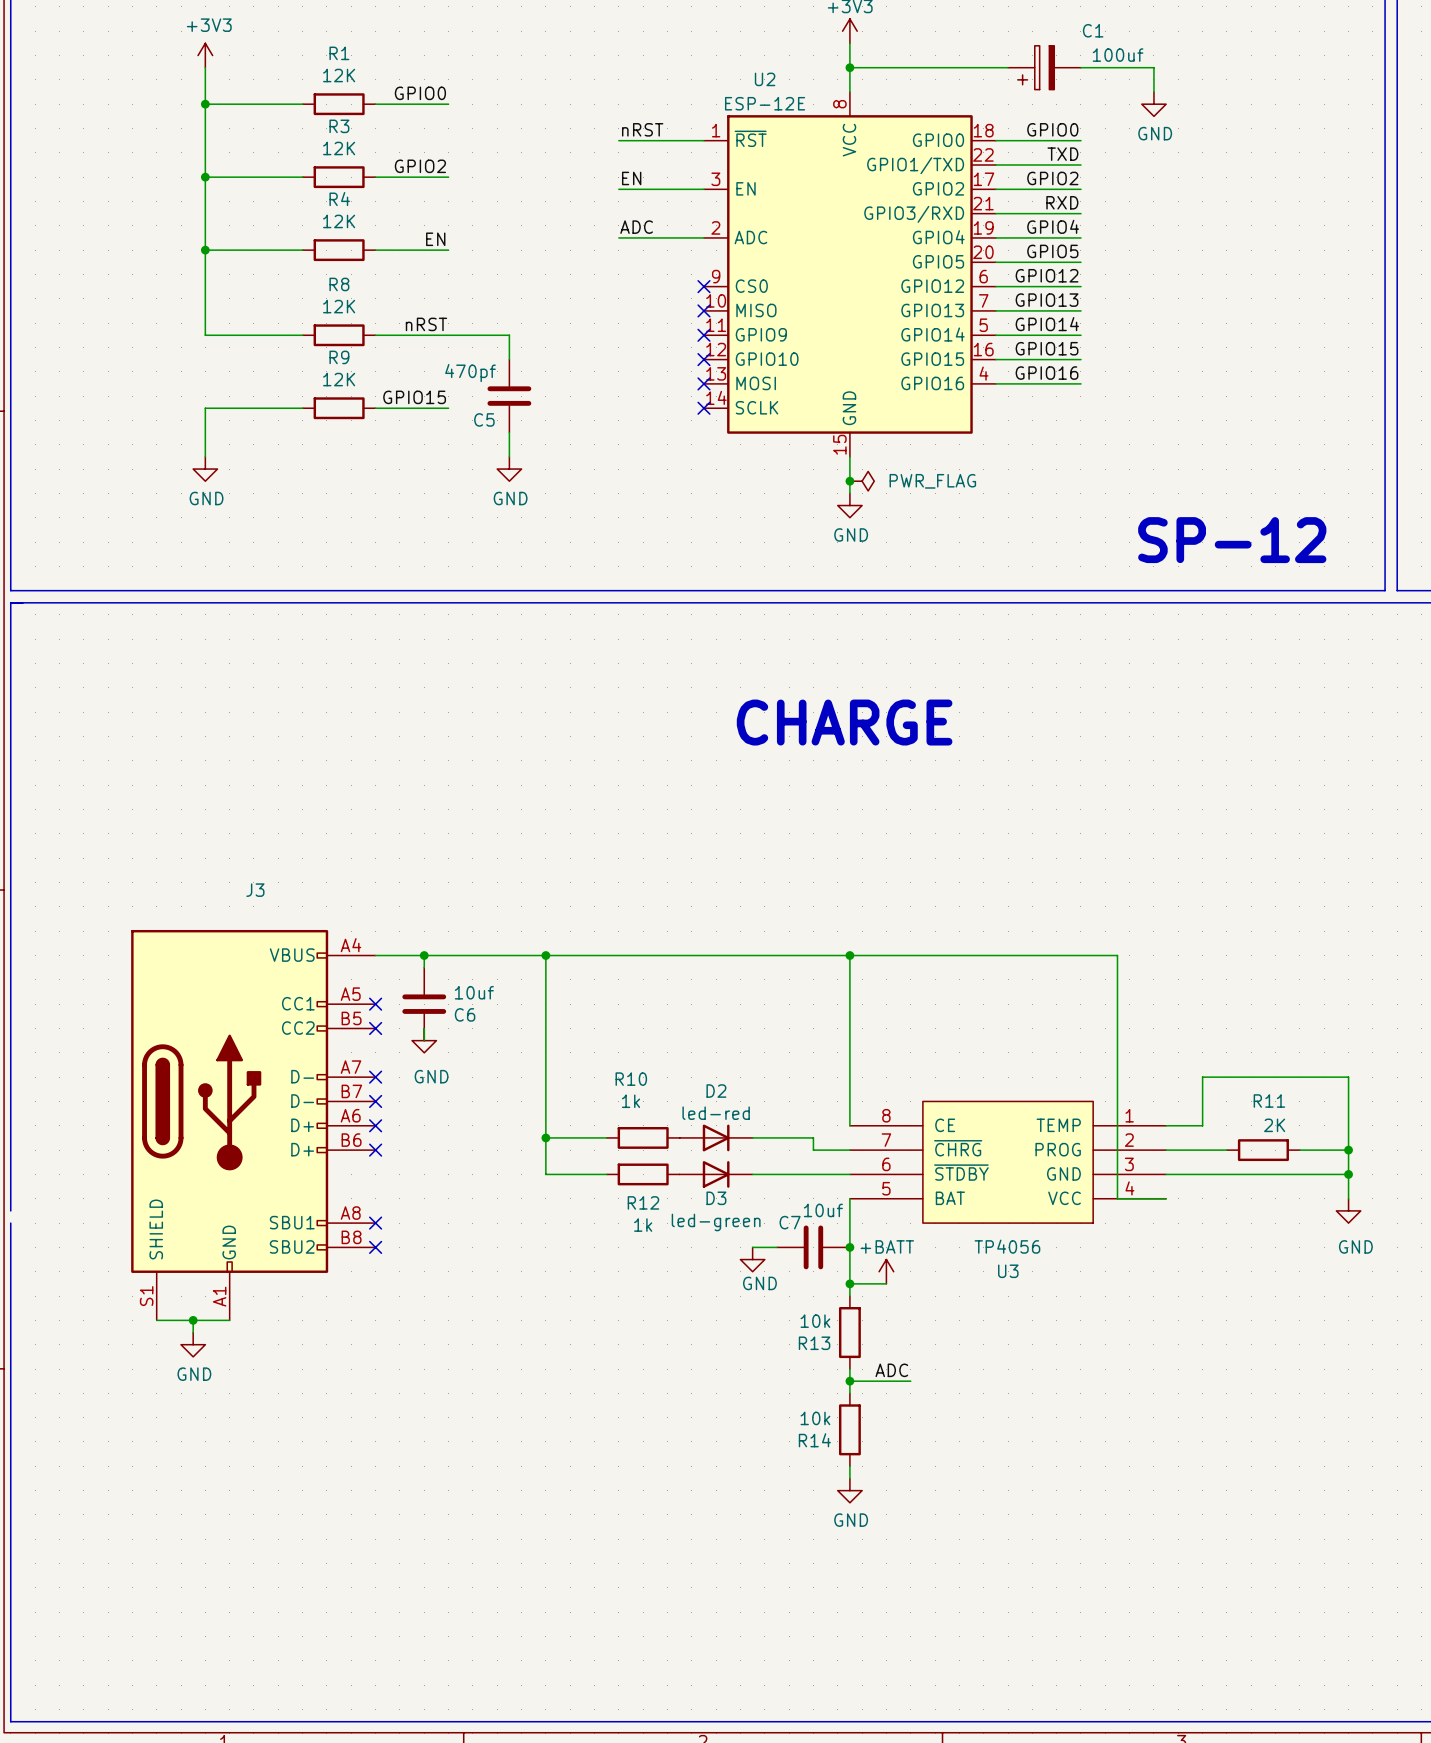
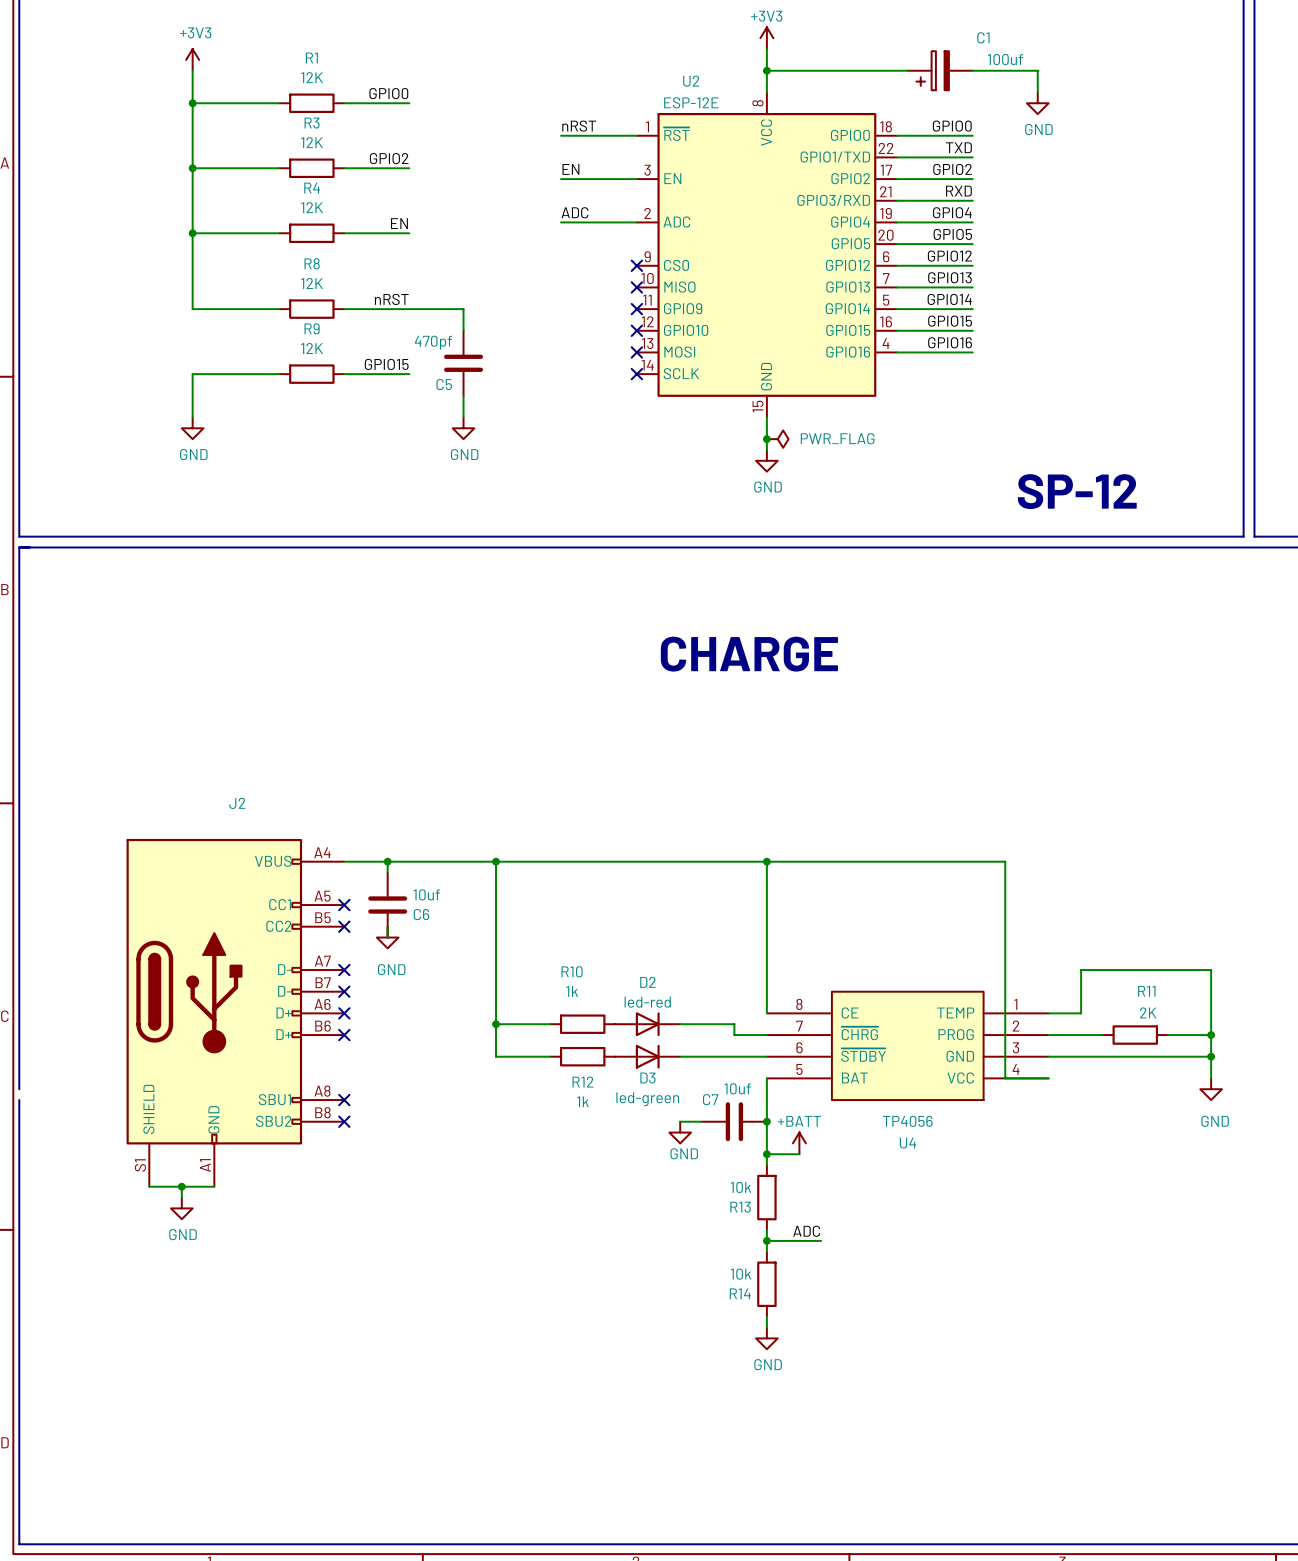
J3 name: J3 (255, 890) -> J2 (237, 803)
U3 name: U3 (1008, 1271) -> U4 (907, 1143)

